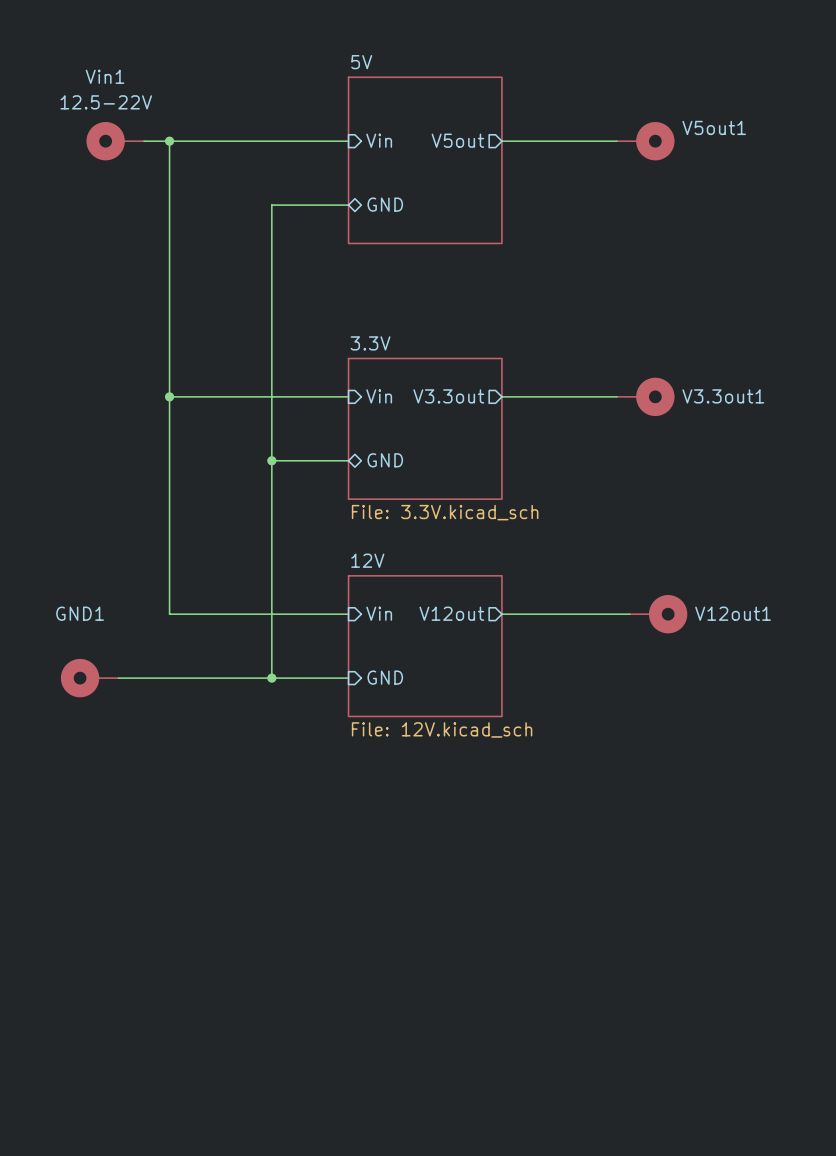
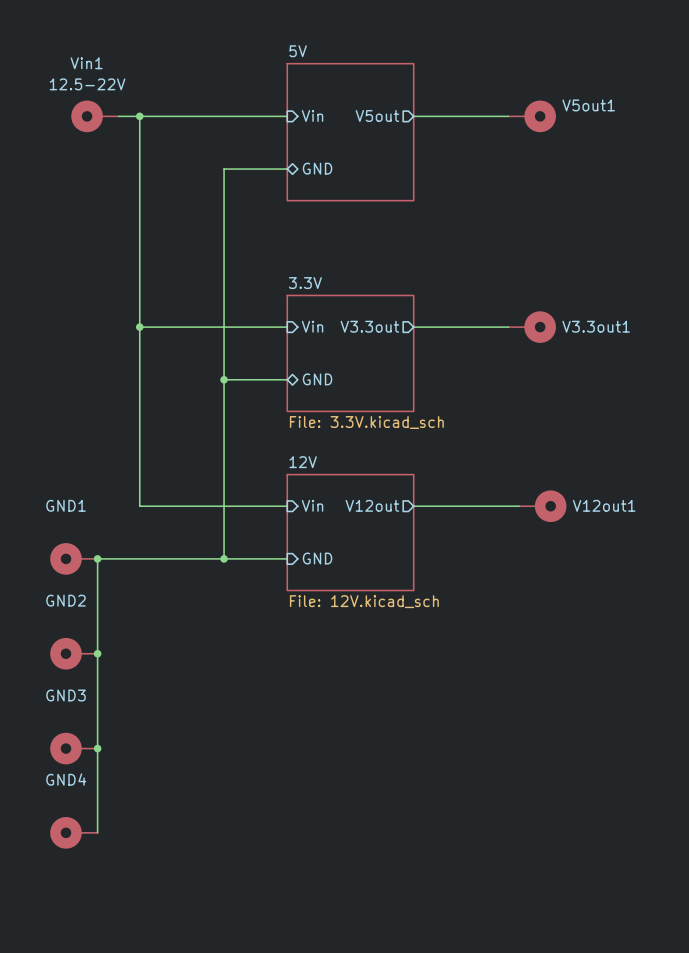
wire: none -> (97, 558) (97, 832)
junction: none -> (97, 558)
GND2: none -> (73, 653)
junction: none -> (97, 653)
GND3: none -> (73, 748)
junction: none -> (97, 748)
GND4: none -> (73, 832)

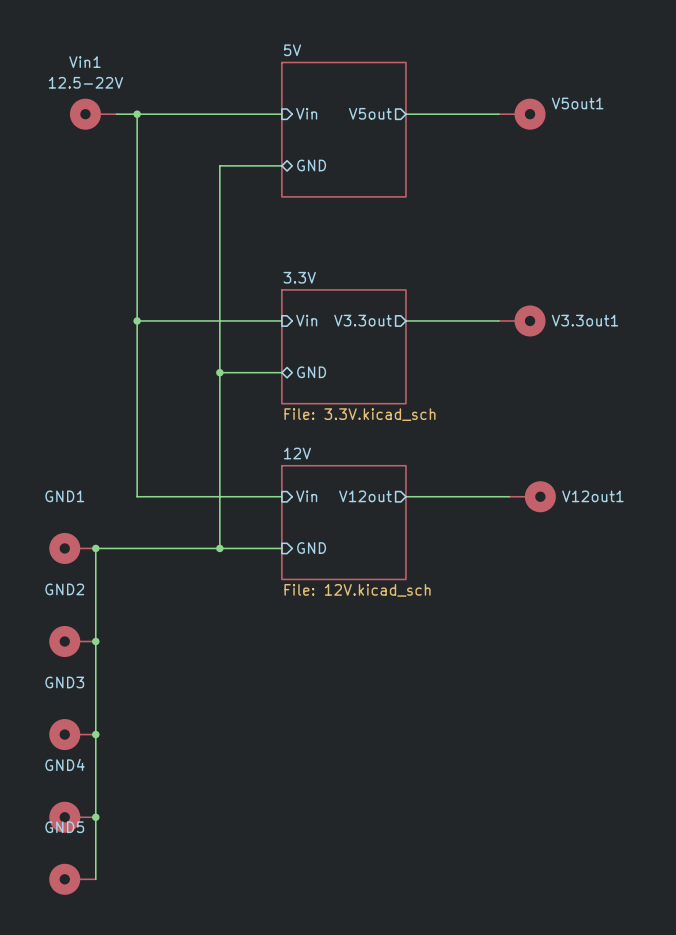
wire: none -> (95, 817) (95, 879)
junction: none -> (95, 817)
GND5: none -> (72, 879)

